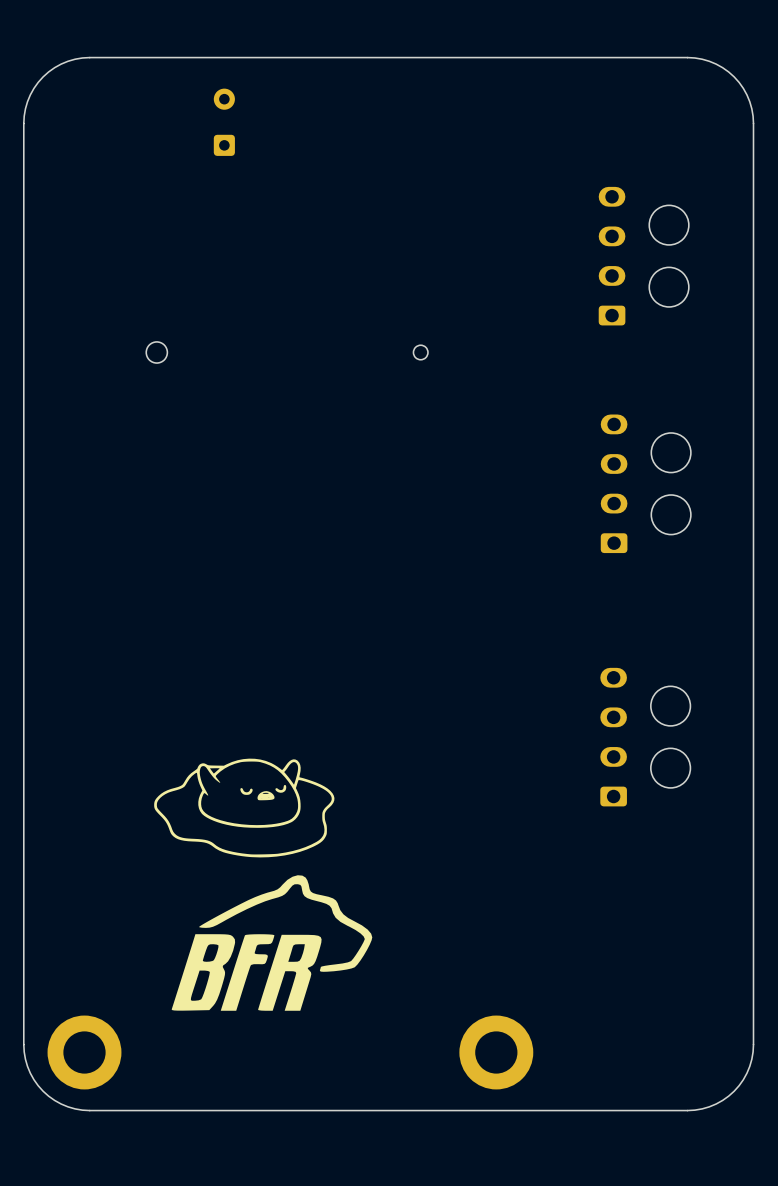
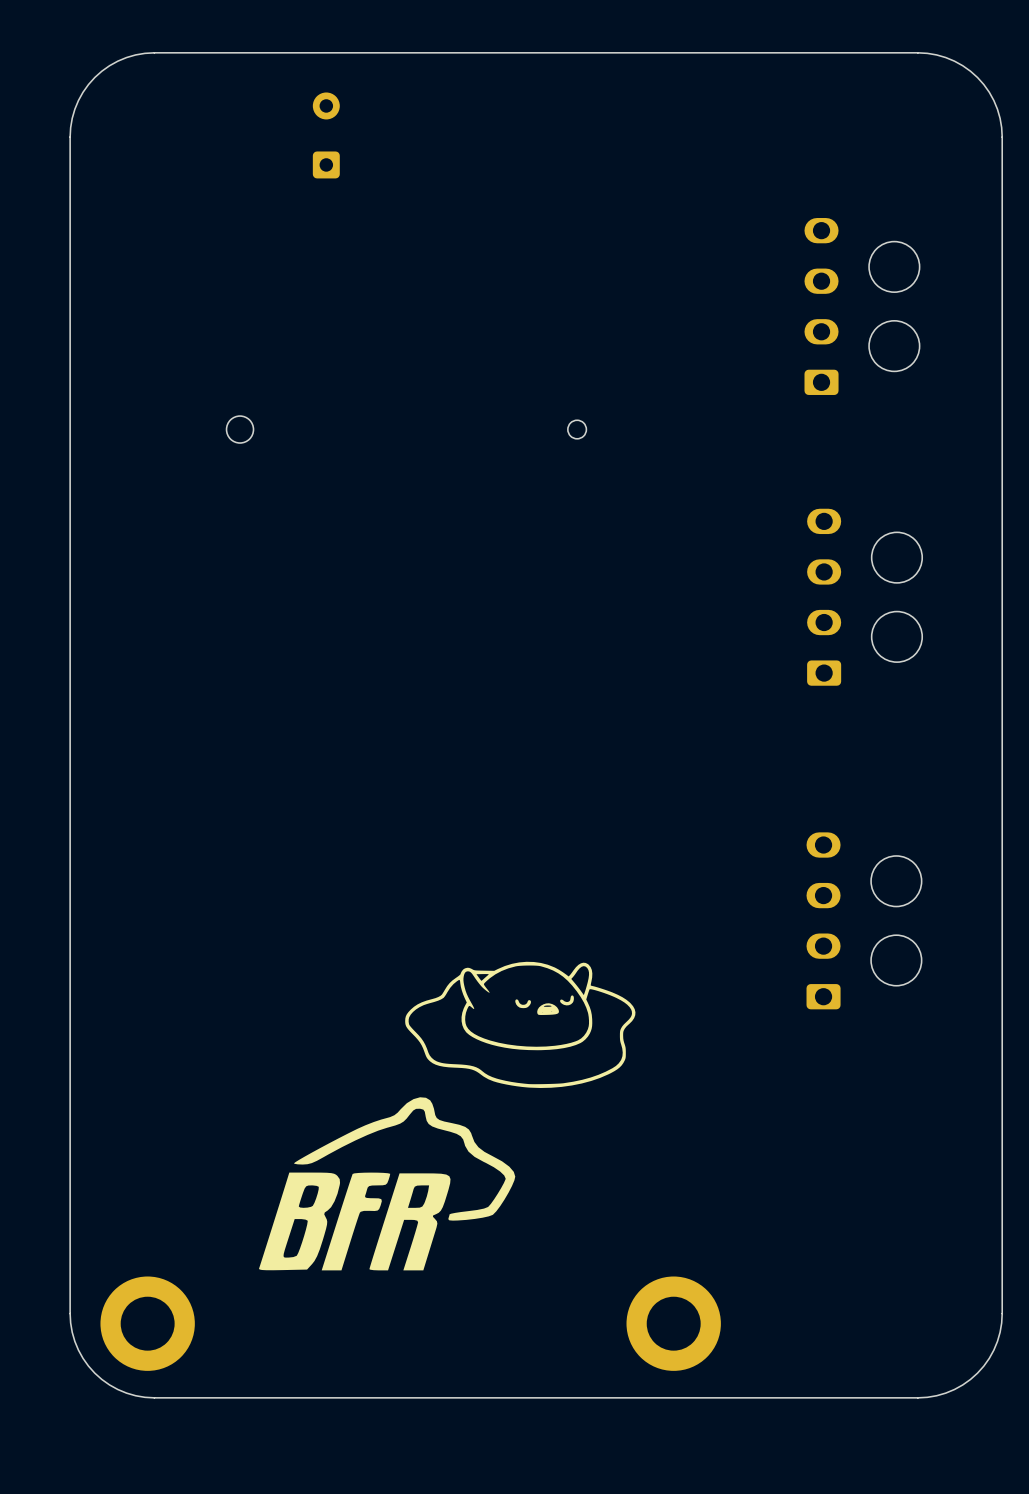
drawing position: (244, 808) -> (520, 1024)

